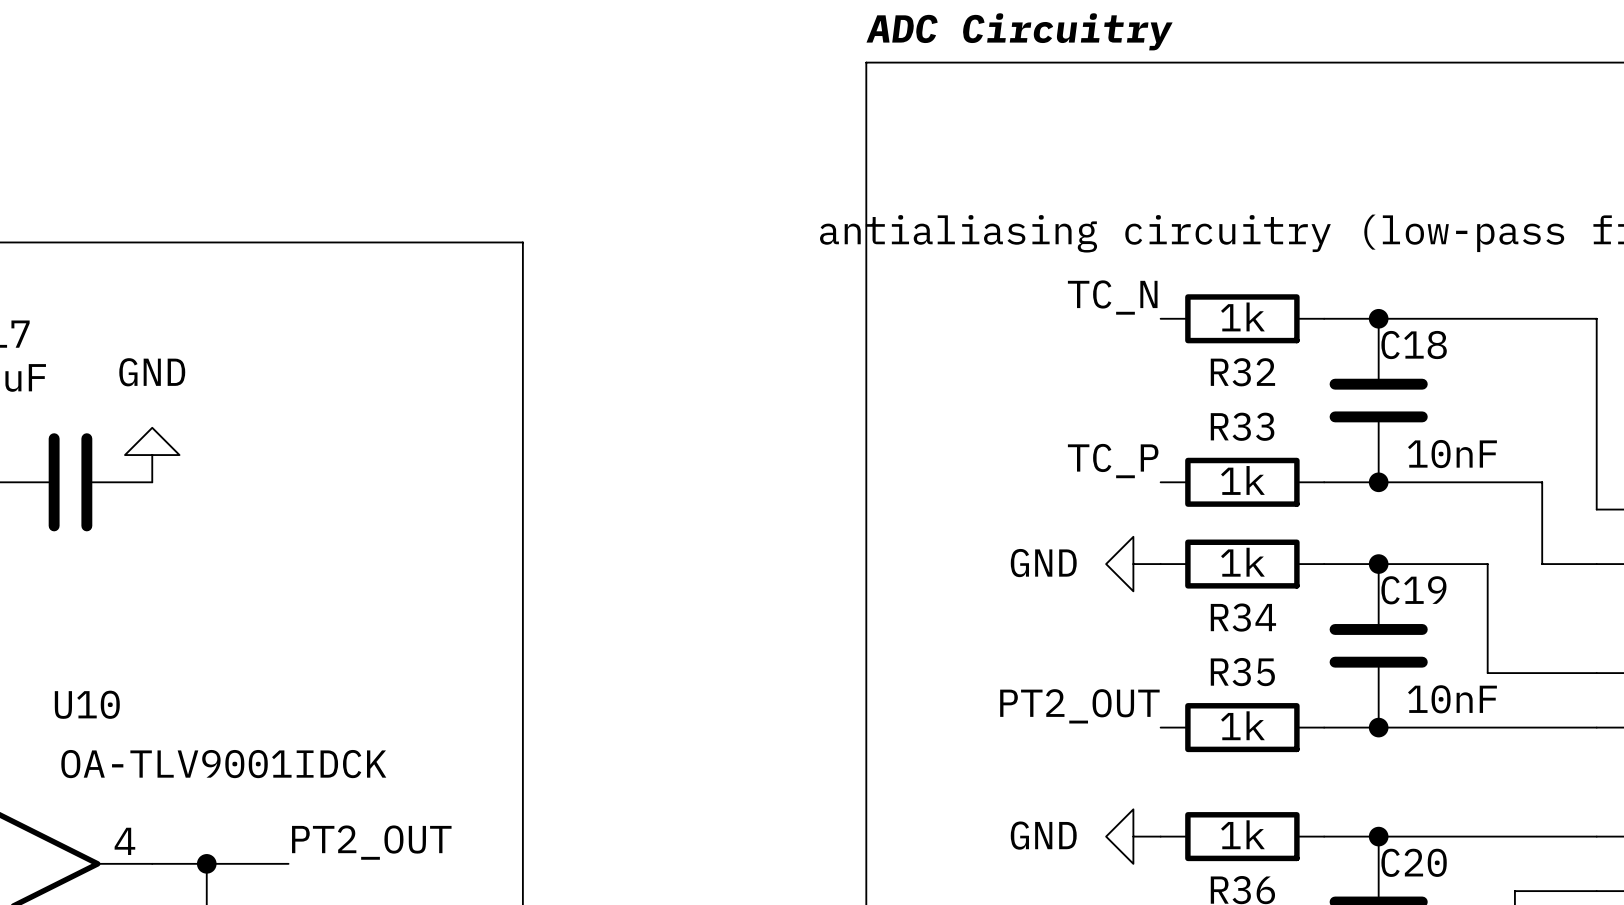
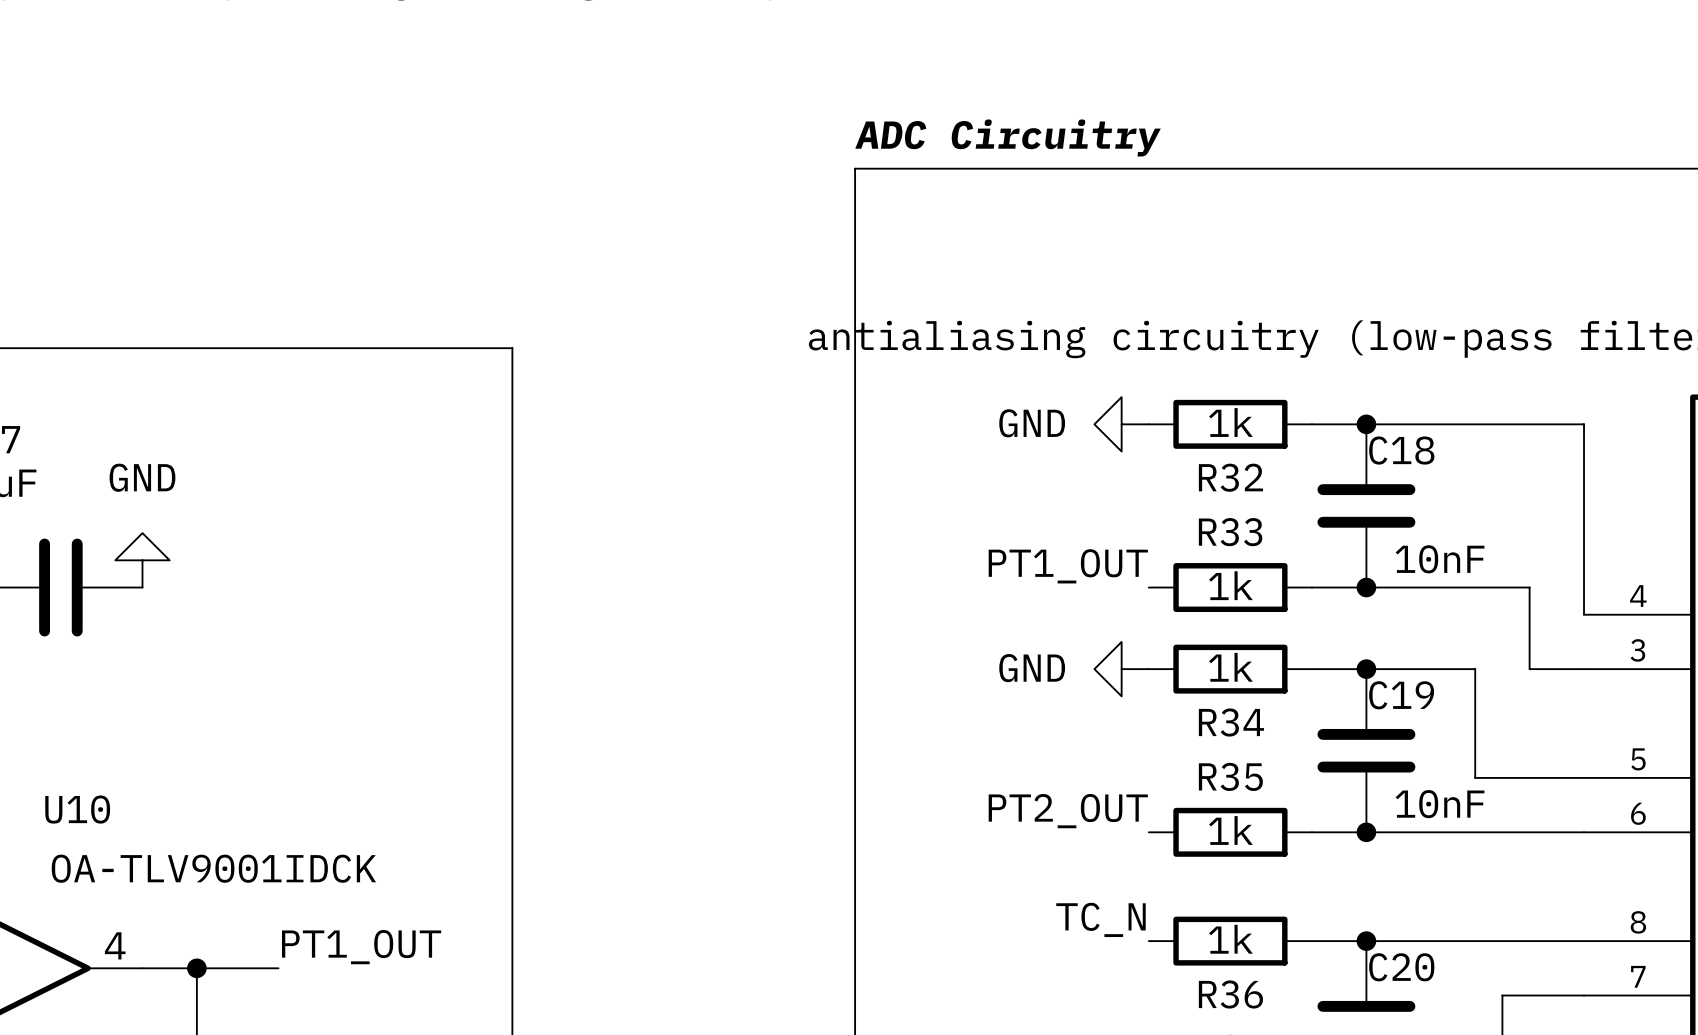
label position: TC_N (1112, 297) -> TC_N (1101, 919)
label: TC_P (1113, 461) -> PT1_OUT (1068, 566)
power symbol position: GND (1133, 836) -> GND (1121, 424)
label: PT2_OUT (371, 842) -> PT1_OUT (361, 947)

